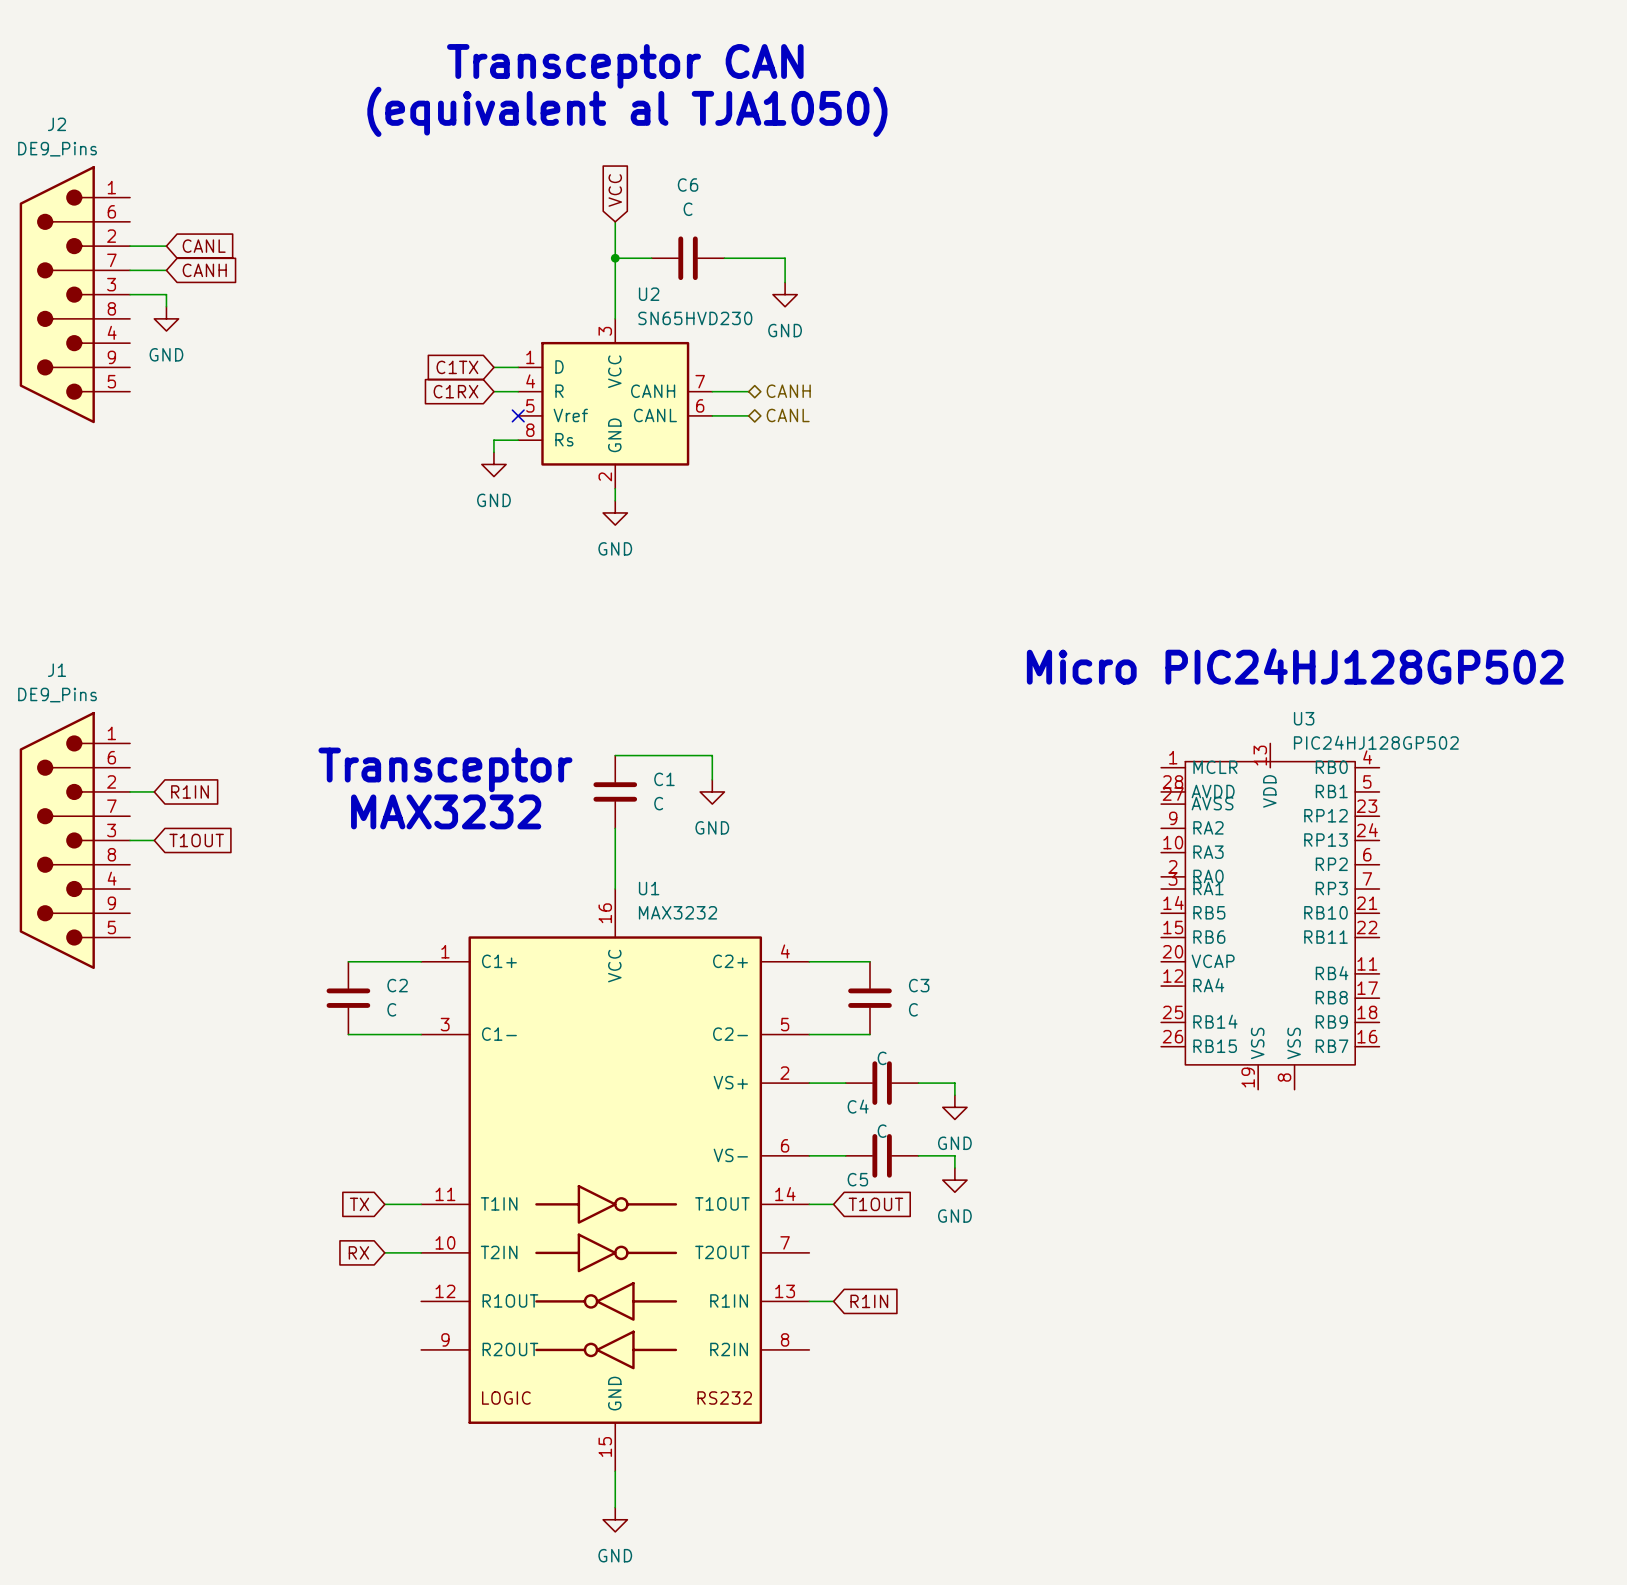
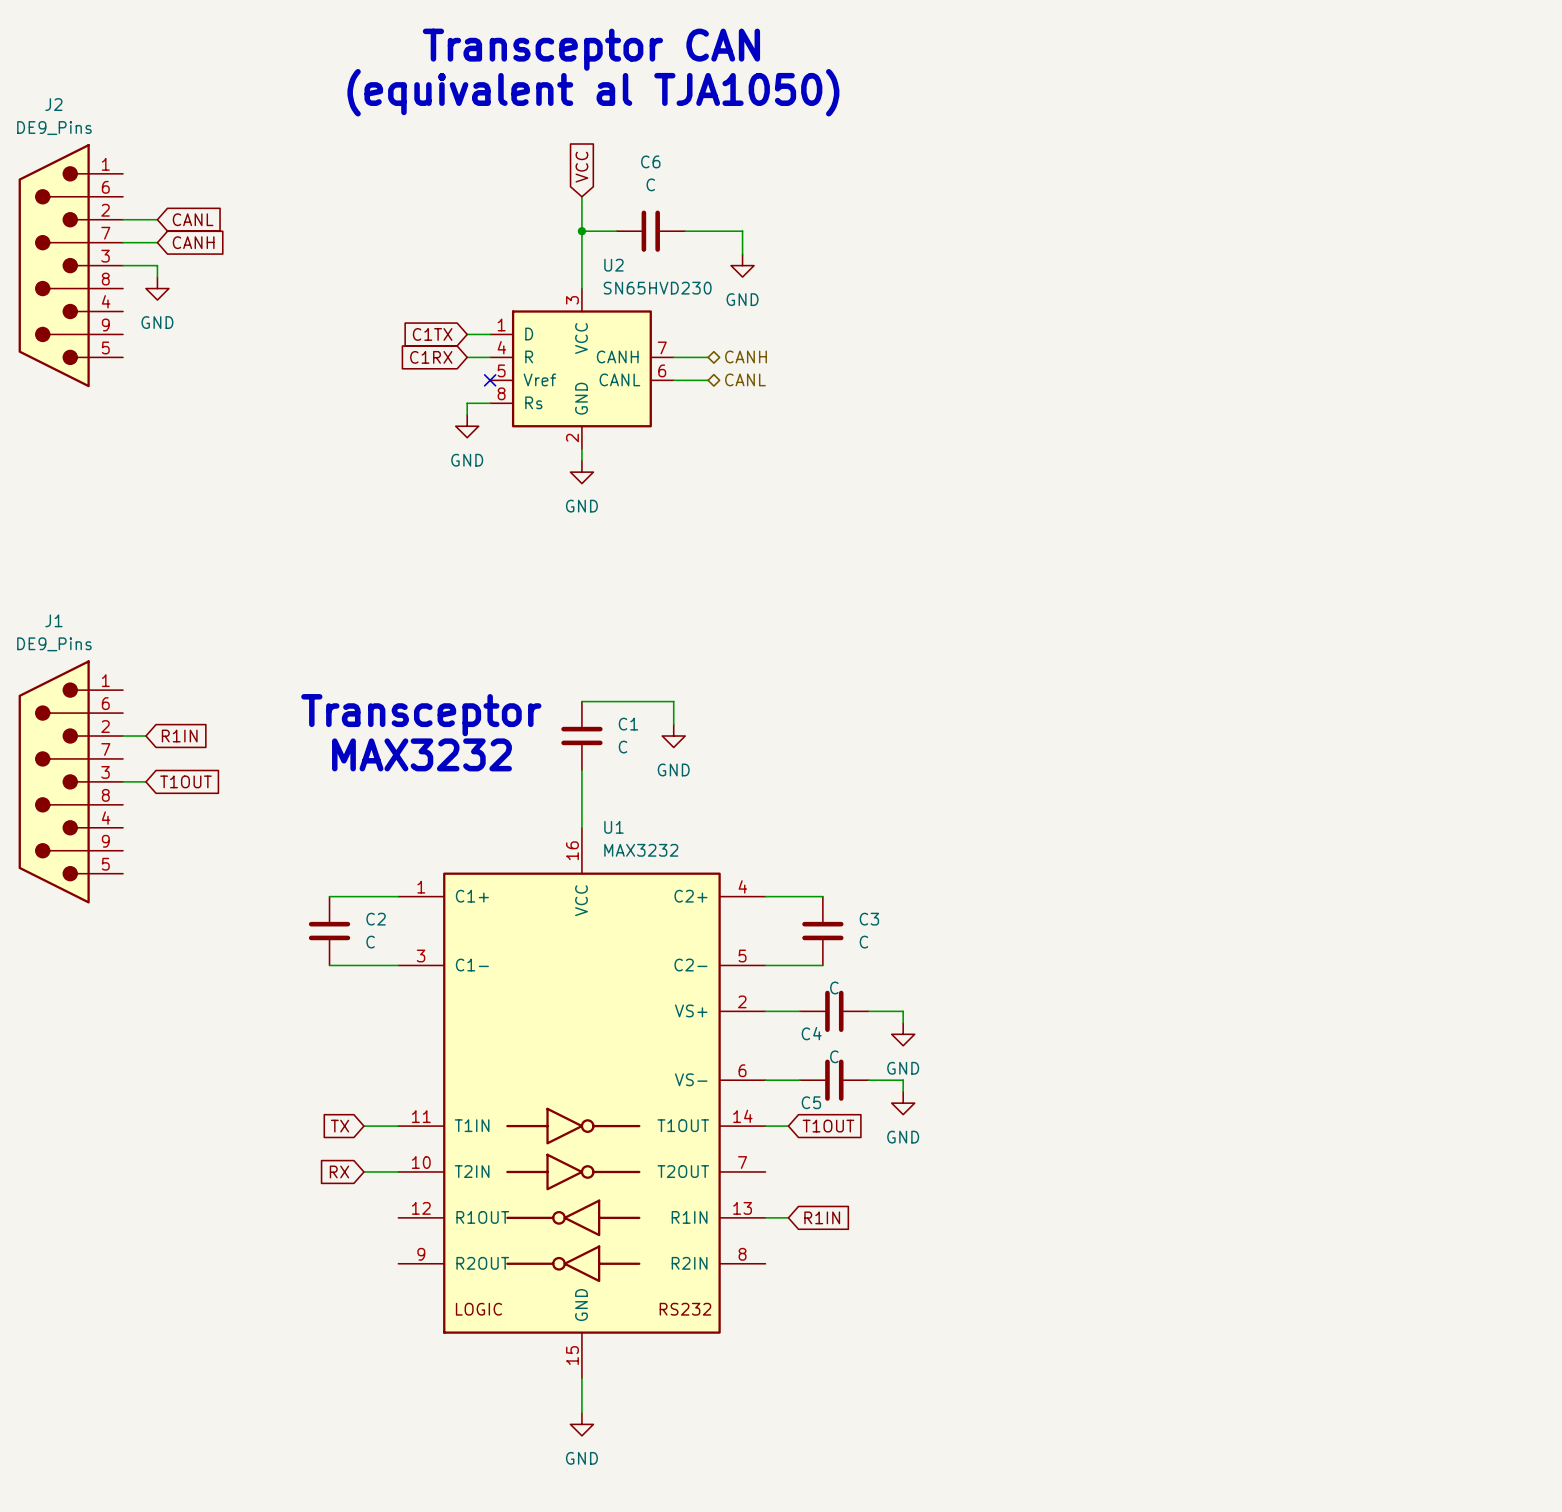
text: Micro PIC24HJ128GP502 (1295, 666) -> none
U3: PIC24HJ128GP502 (1270, 916) -> none

